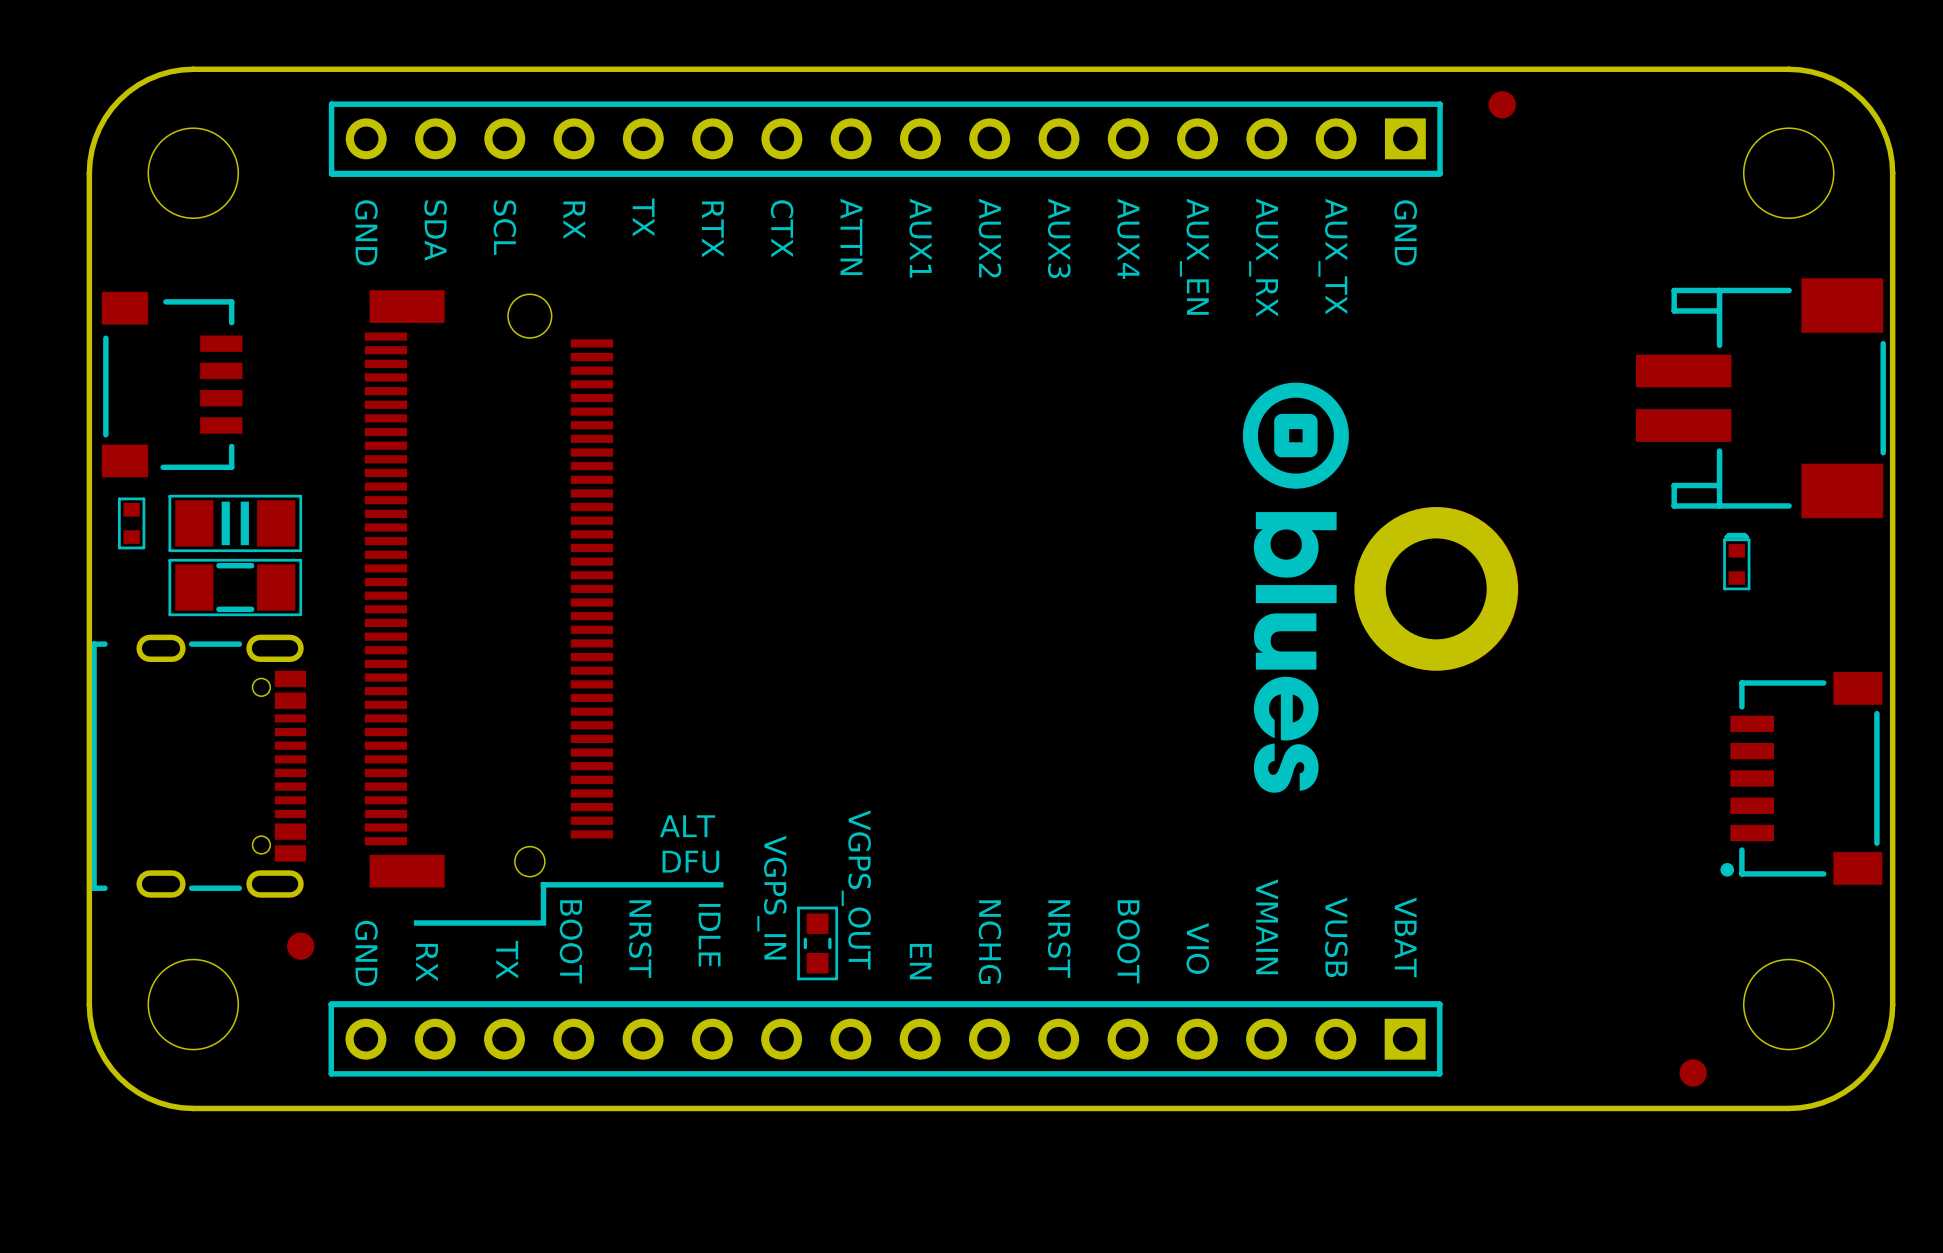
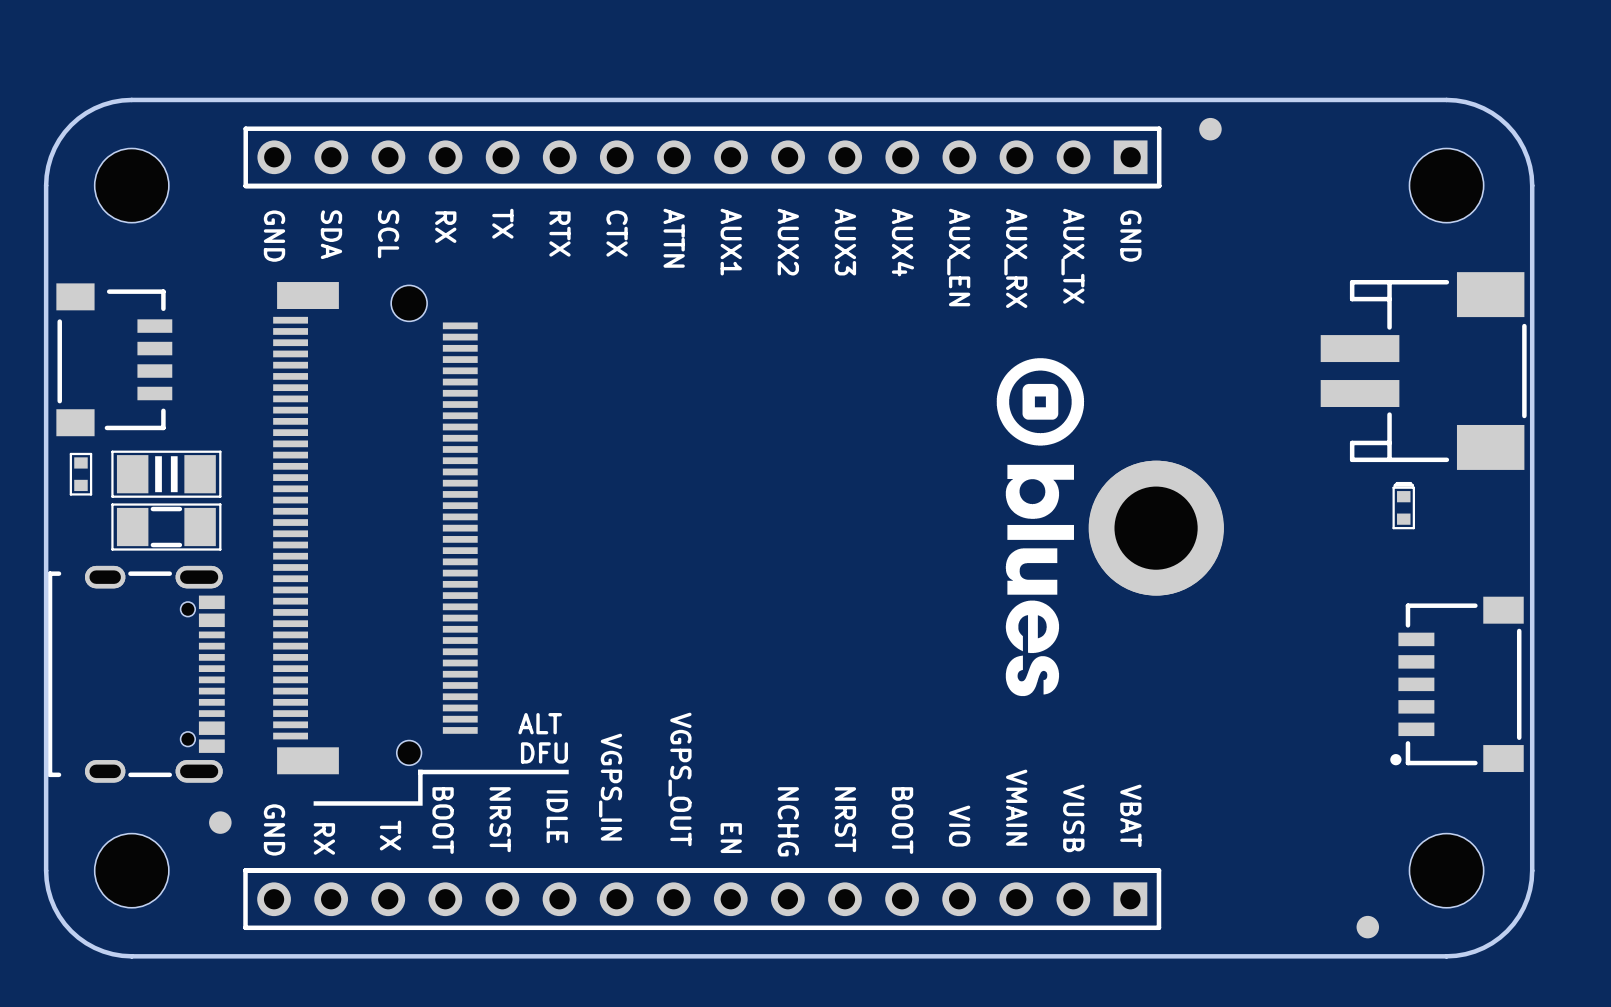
part: (817, 943) -> none

